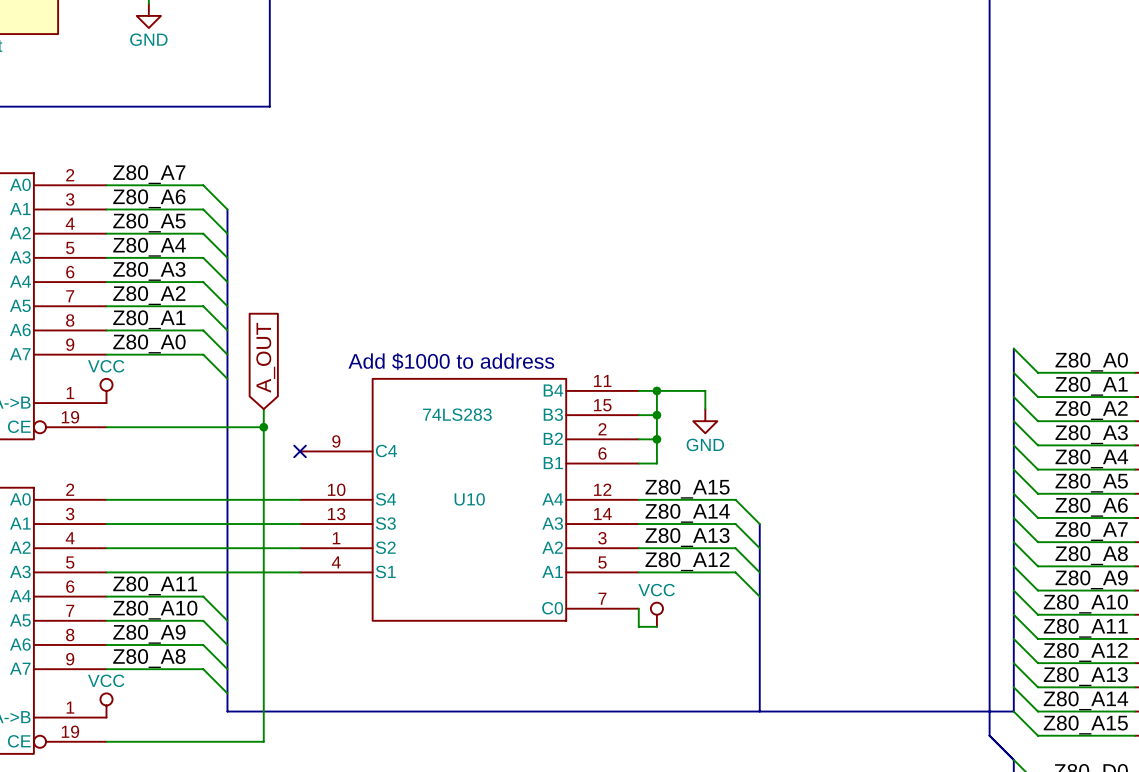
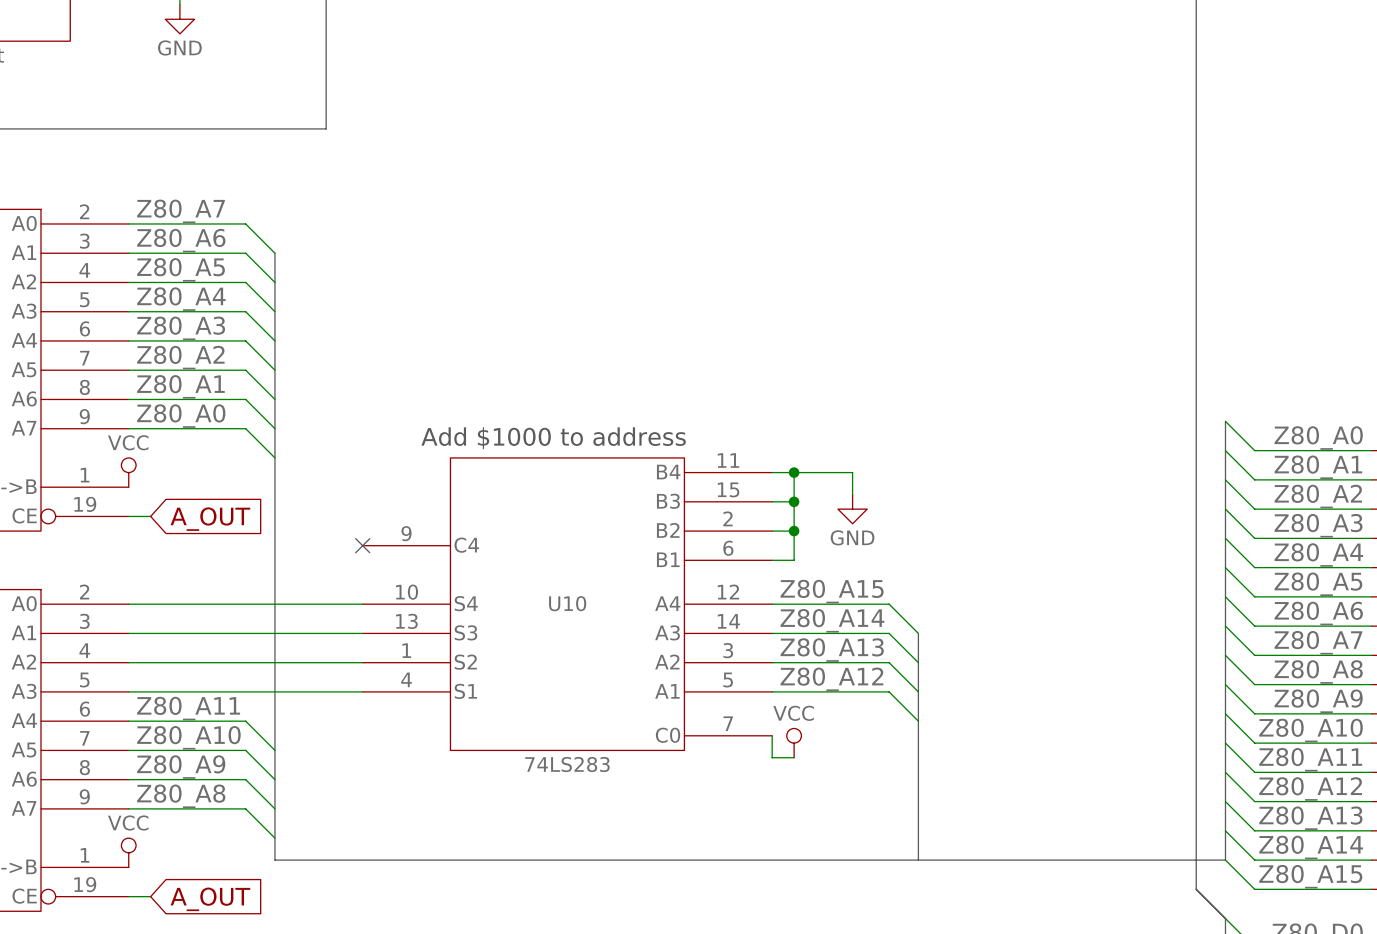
global label rotation: 0° (265, 357) -> 90° clockwise (210, 519)
wire: (263, 409) (263, 741) (124, 741) -> none
U10 value position: 74LS283 (457, 414) -> 74LS283 (567, 764)
wire: (124, 427) (263, 427) -> none
junction: (263, 427) -> none
global label: none -> A_OUT (210, 899)

